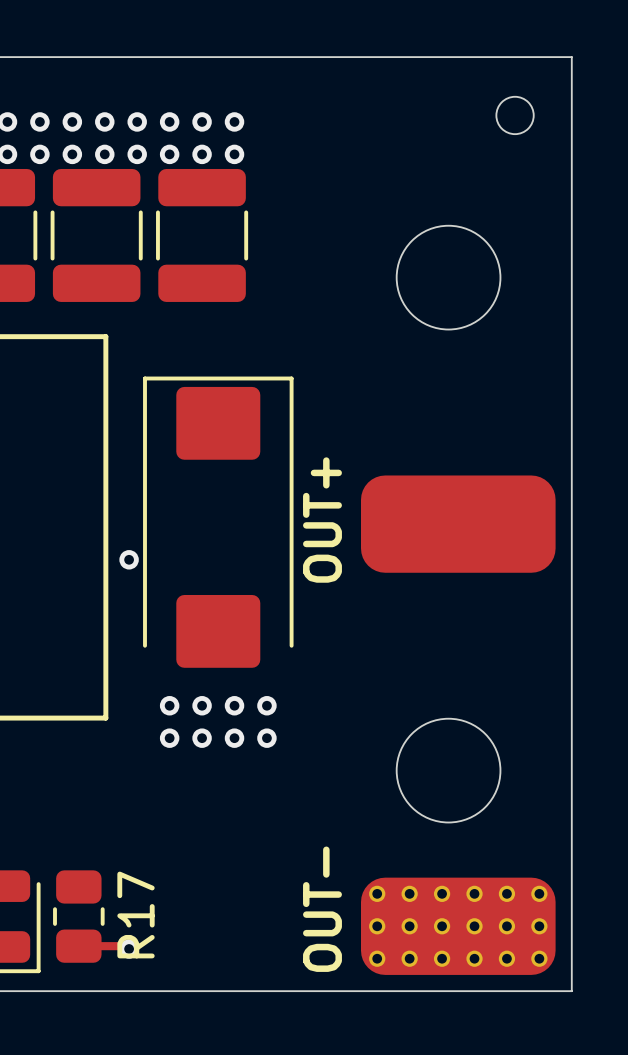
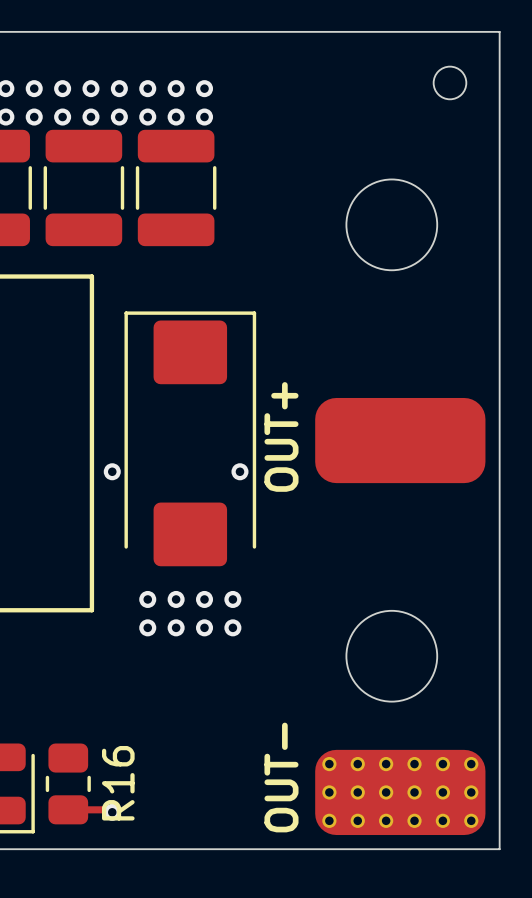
via: none -> (239, 471)
R17 name: R17 (136, 915) -> R16 (118, 783)

